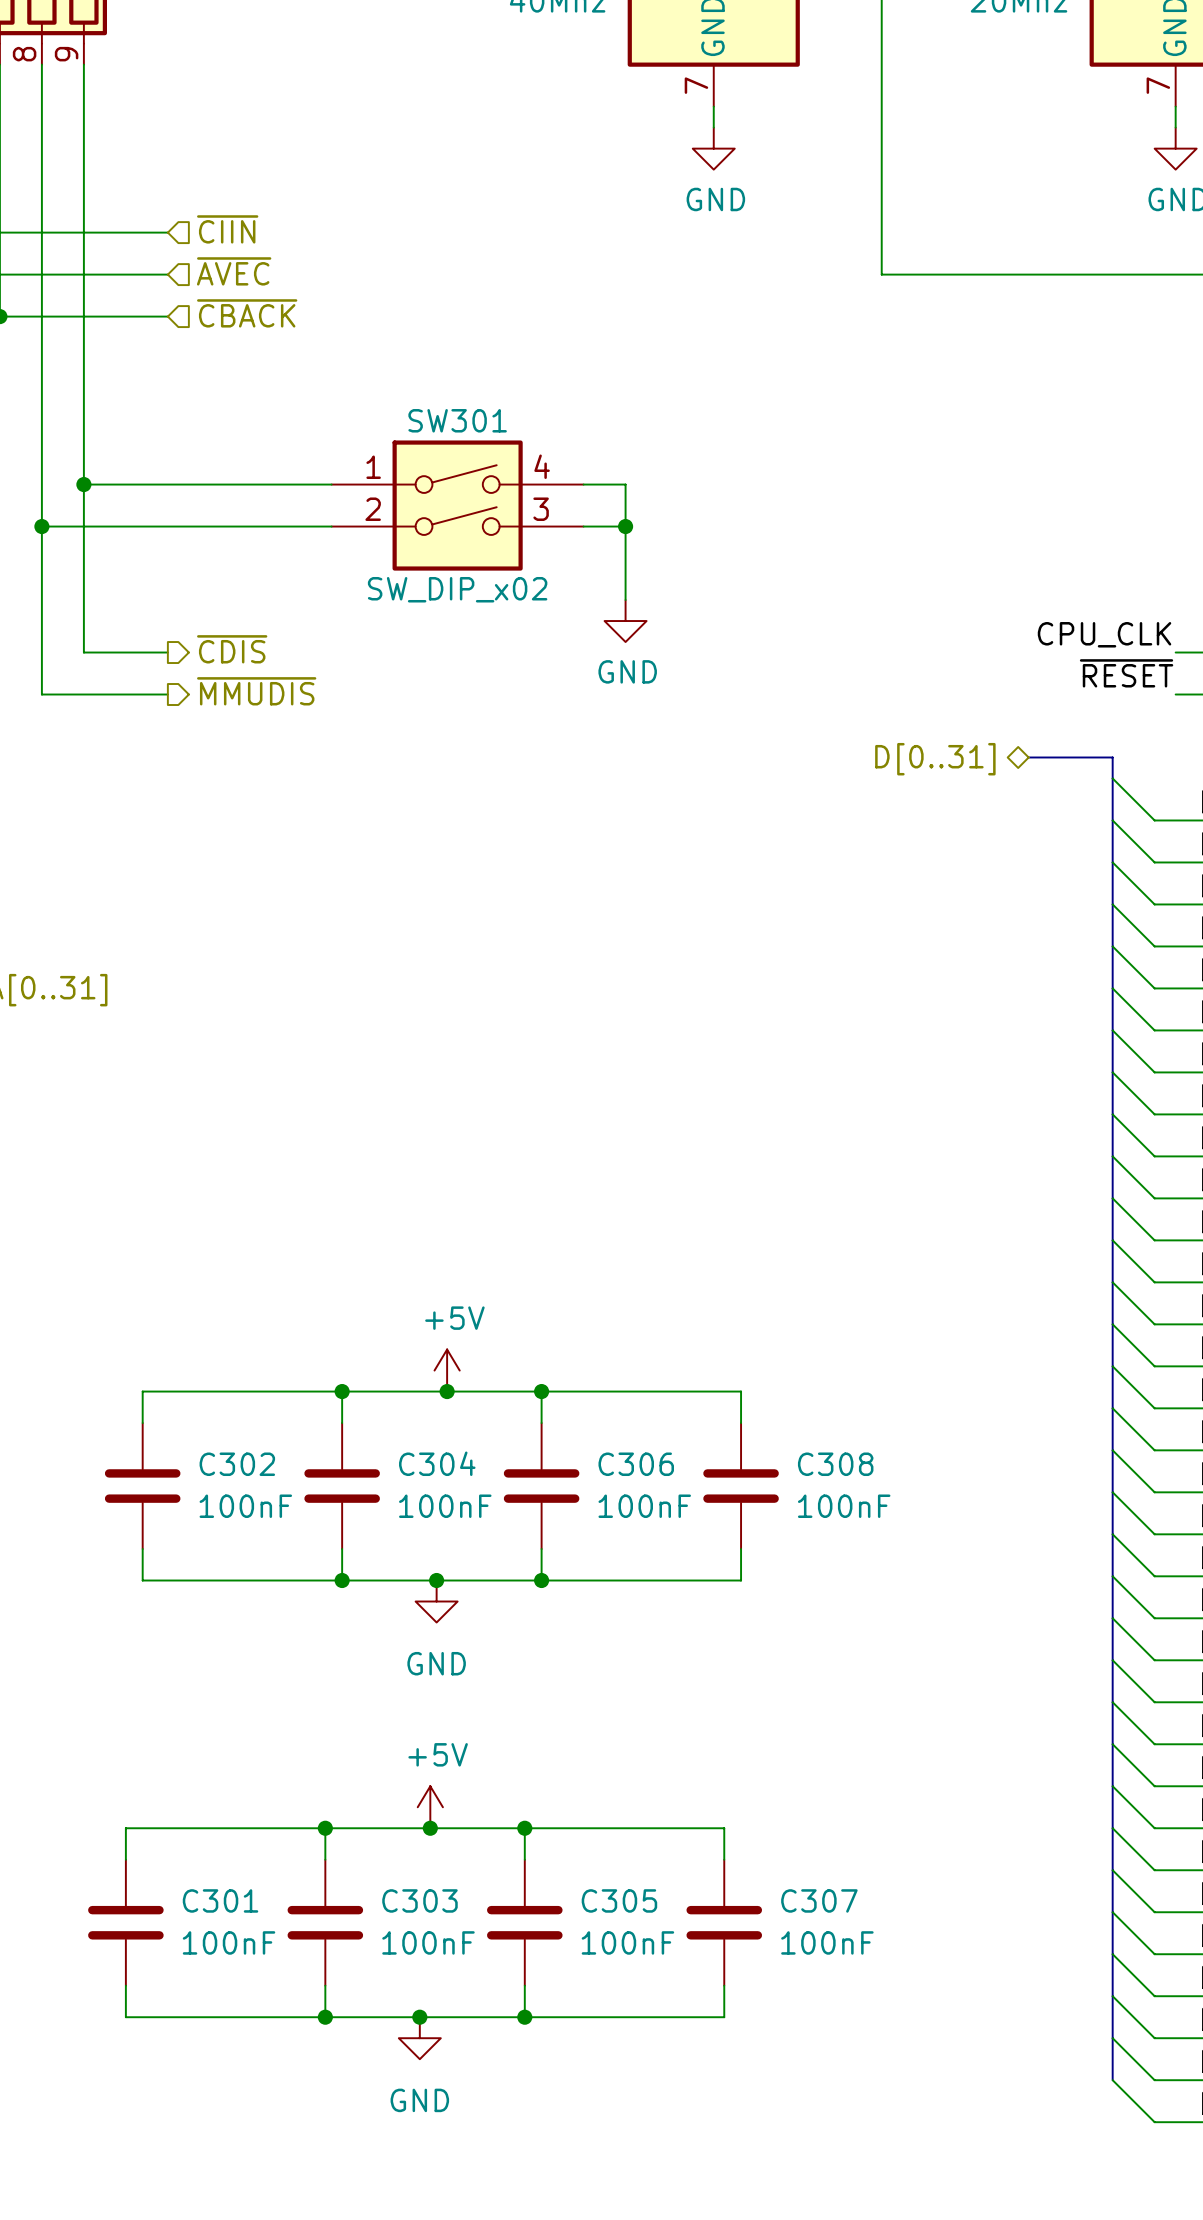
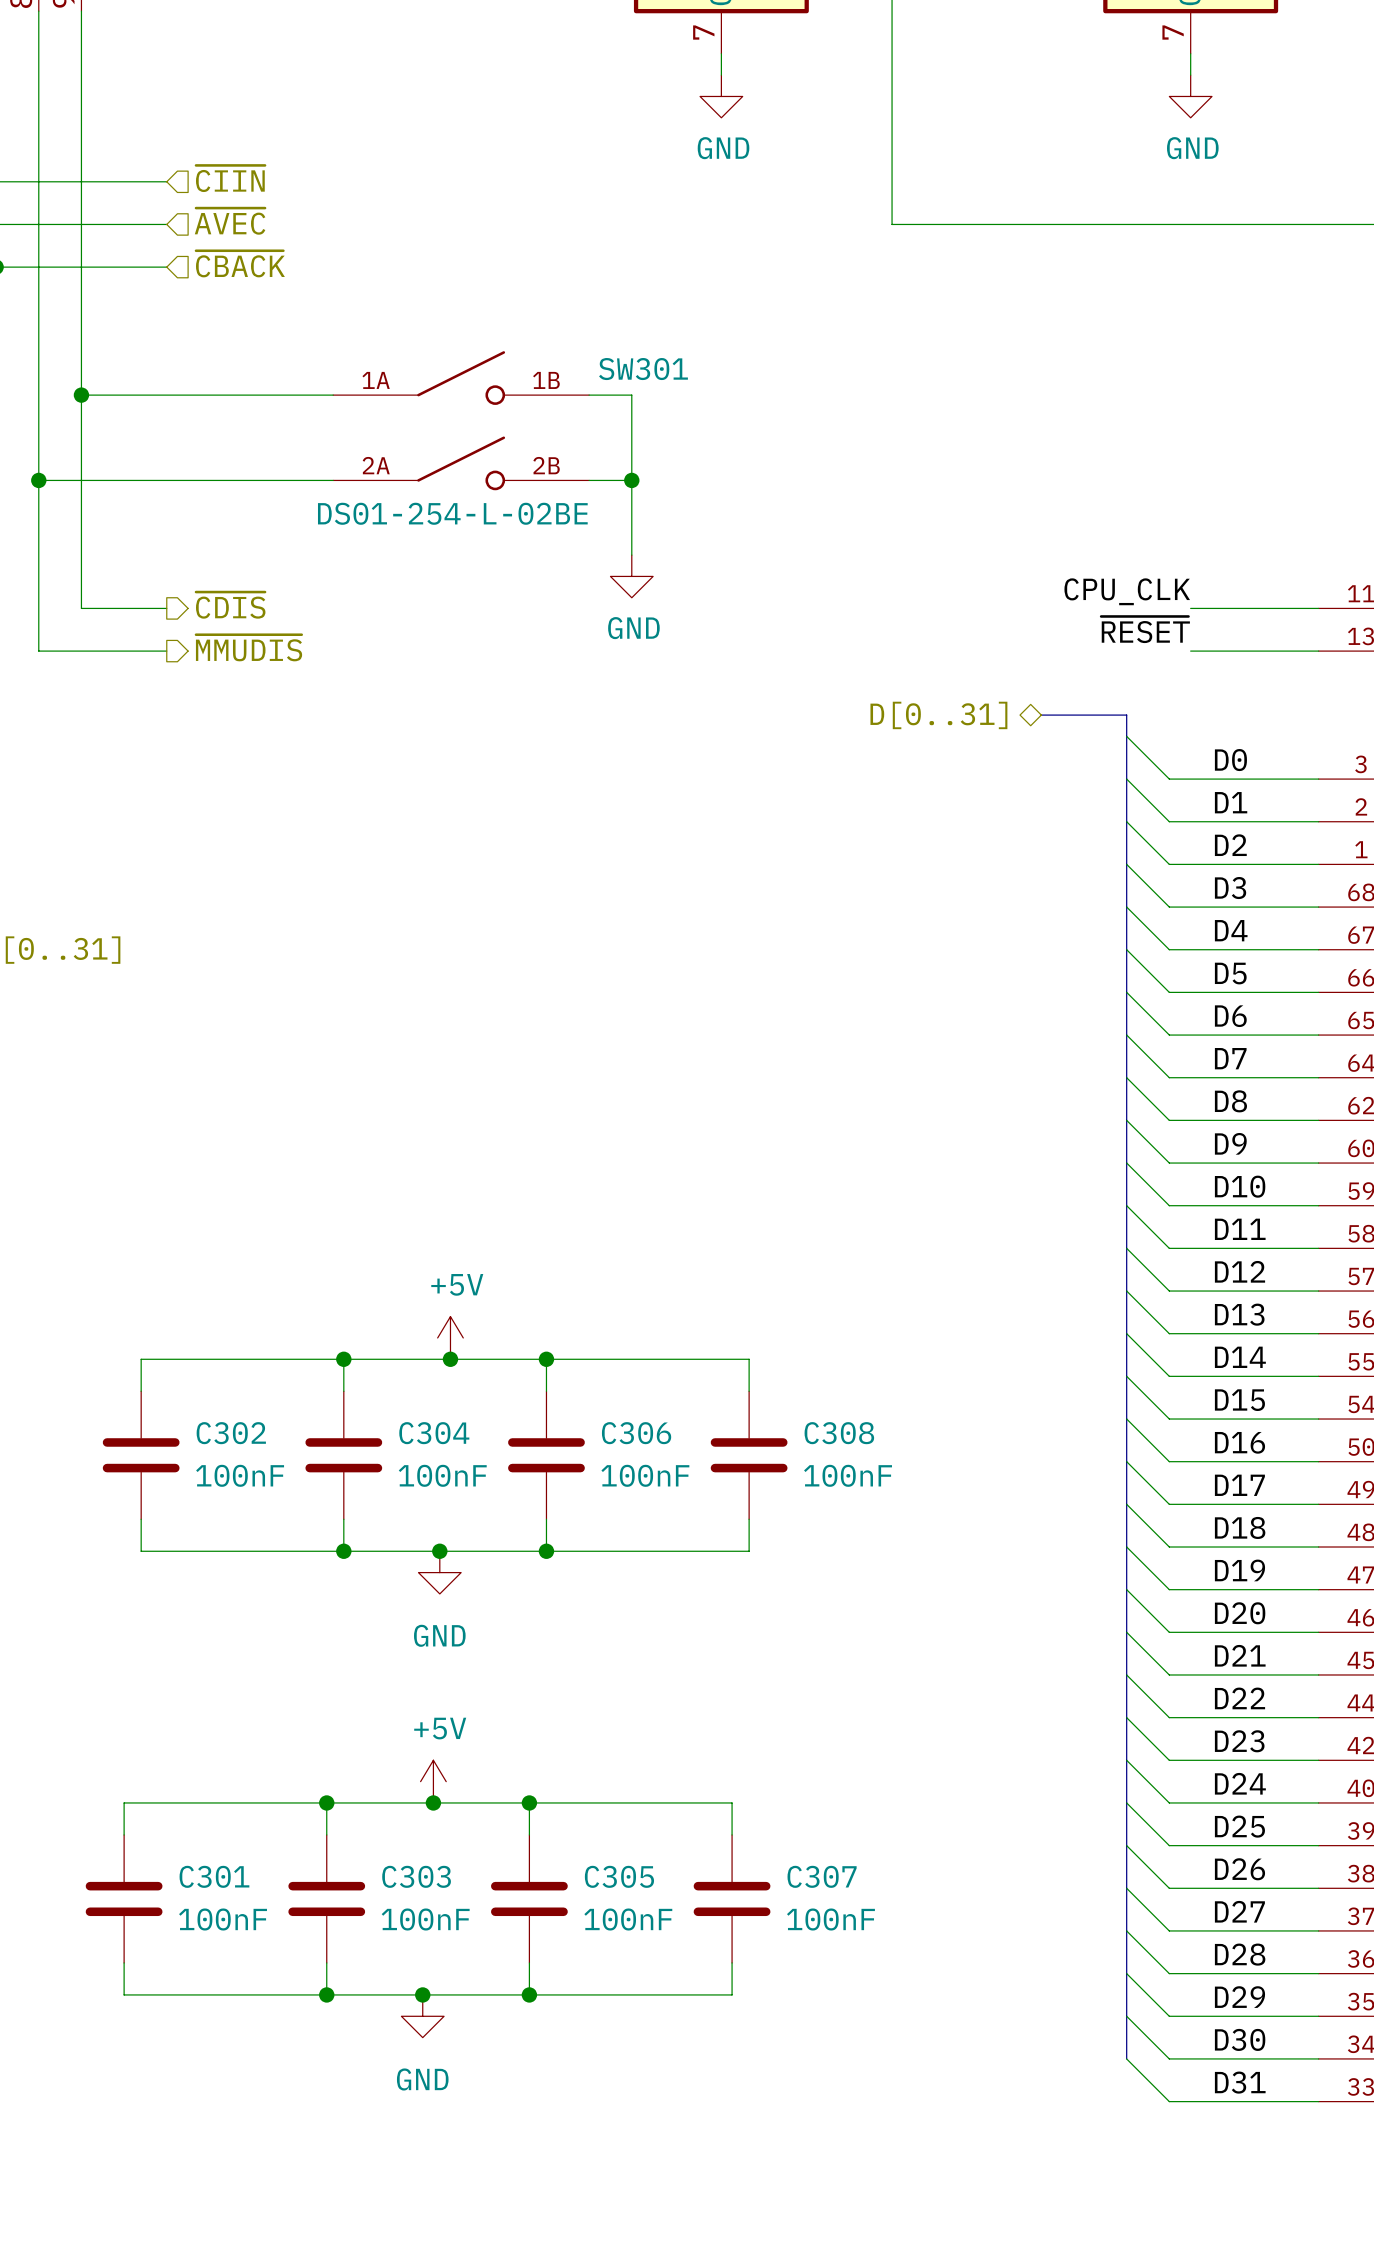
SW301 name position: SW301 (457, 420) -> SW301 (643, 369)
SW301 symbol: [331, 440, 584, 571] -> [333, 351, 590, 491]
wire: (83, 484) (331, 484) -> (81, 395) (333, 395)
junction position: (83, 484) -> (81, 395)
wire: (583, 484) (625, 484) -> (589, 395) (631, 395) (631, 437)
SW301 value: SW_DIP_x02 (457, 589) -> DS01-254-L-02BE (452, 513)

